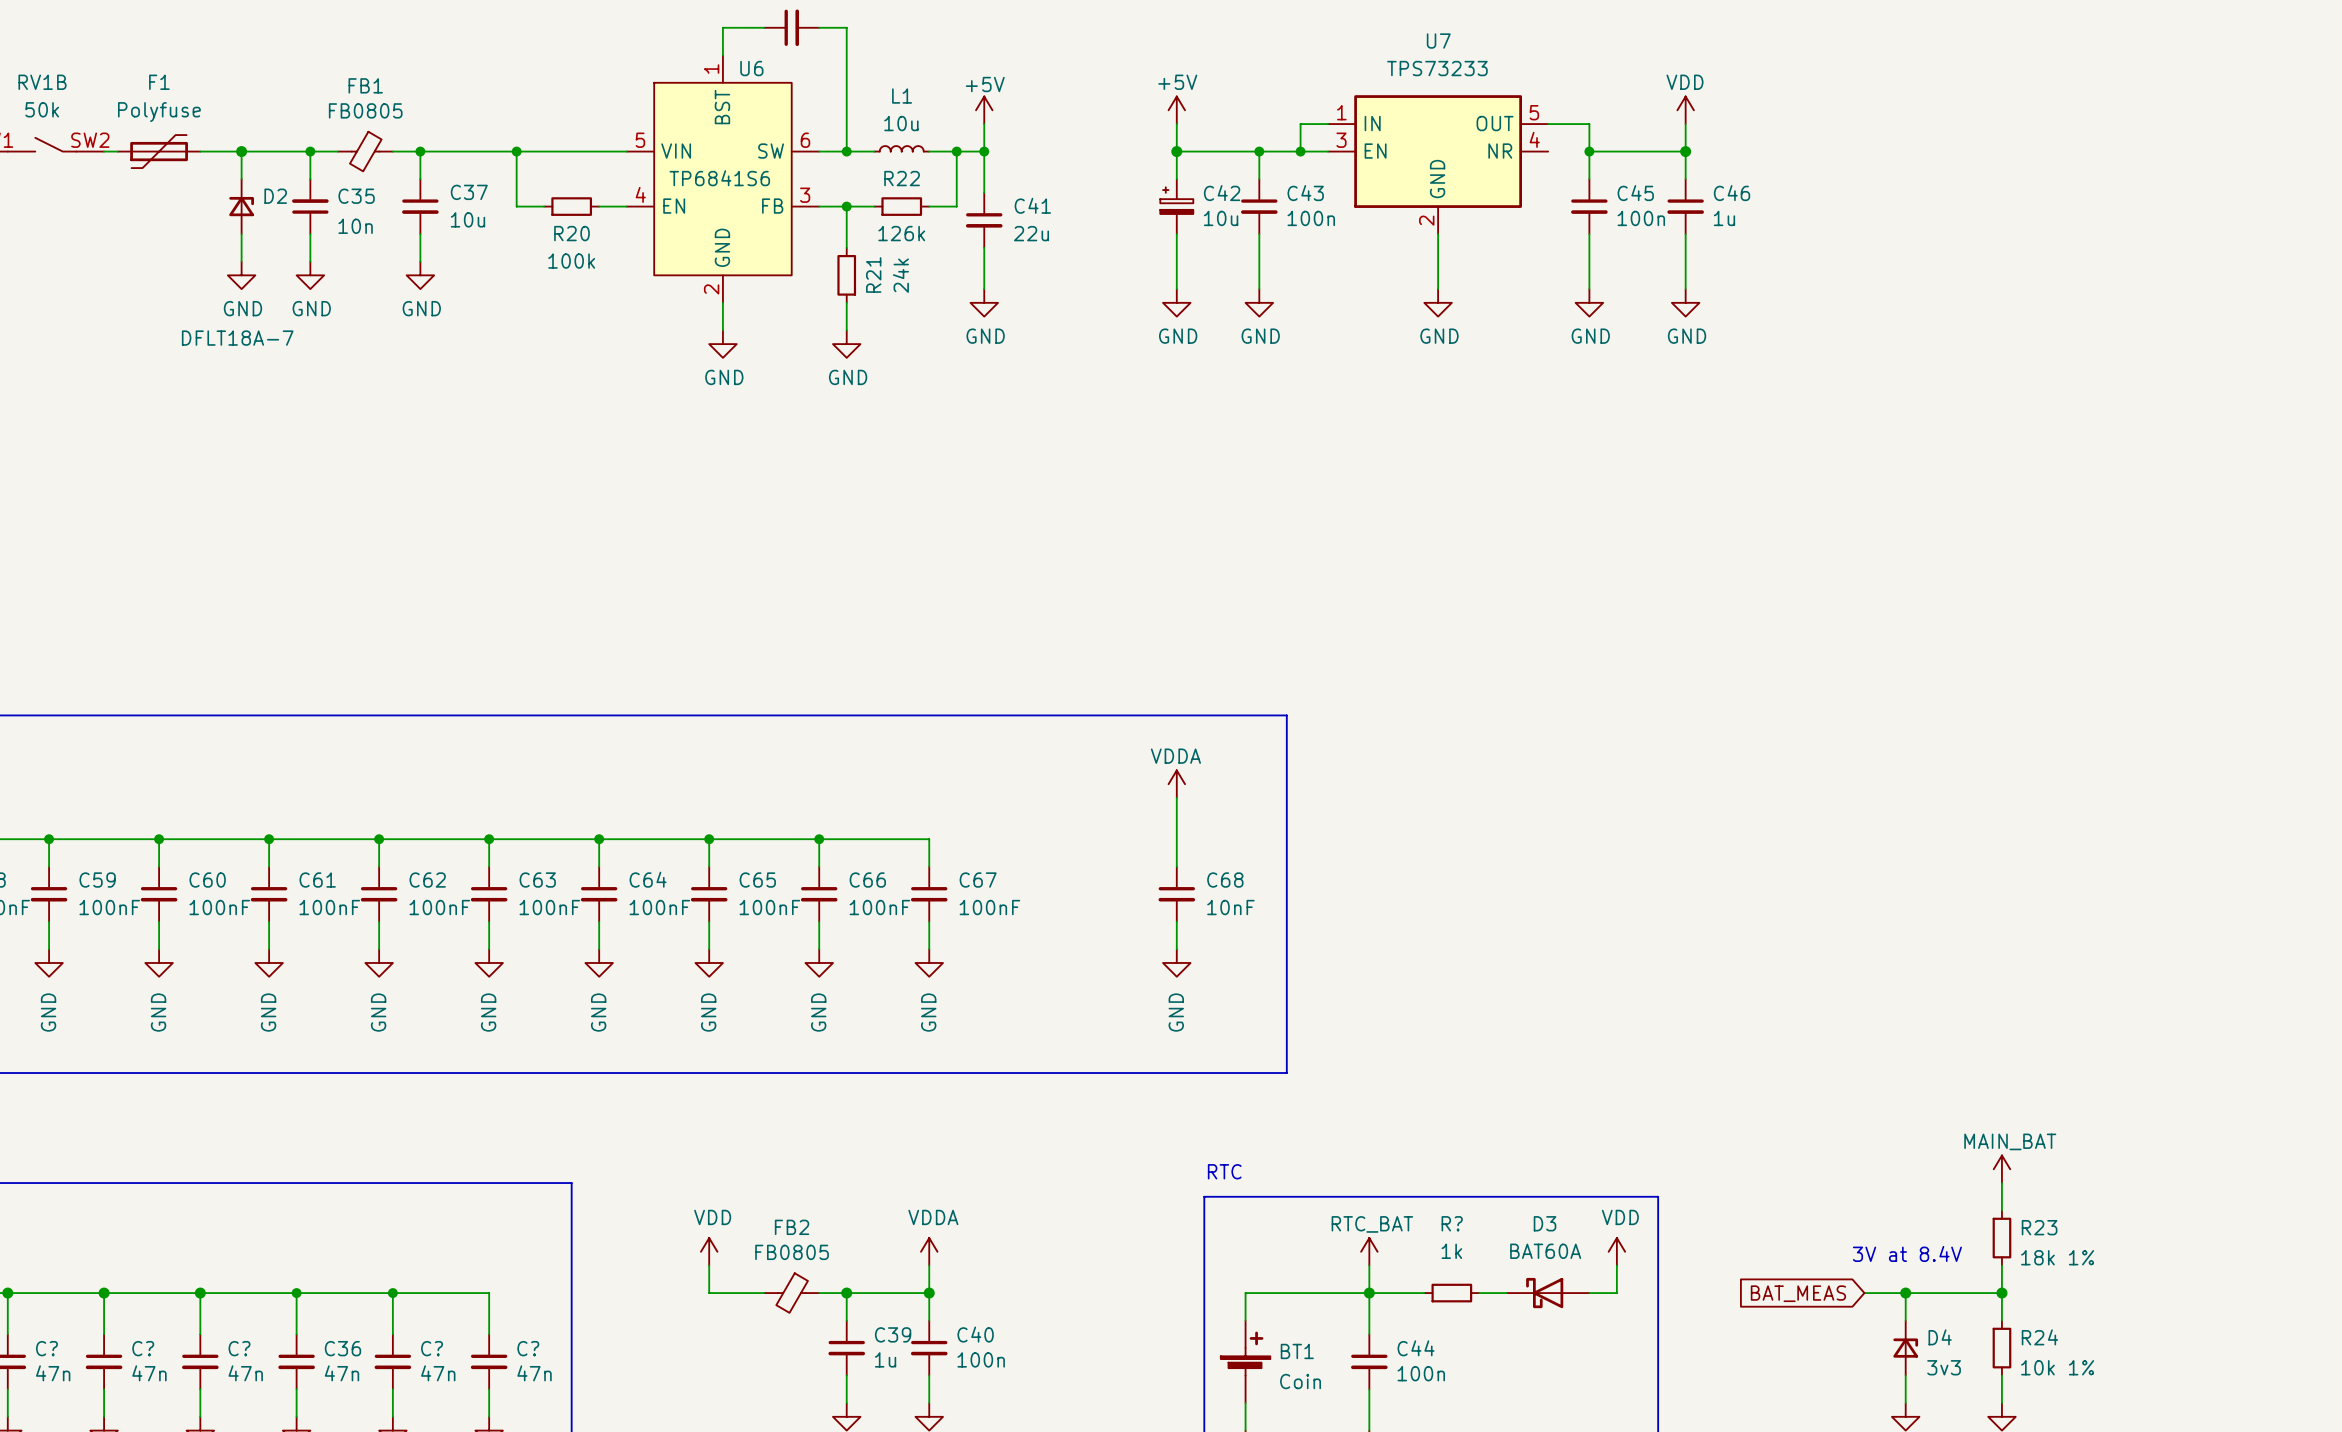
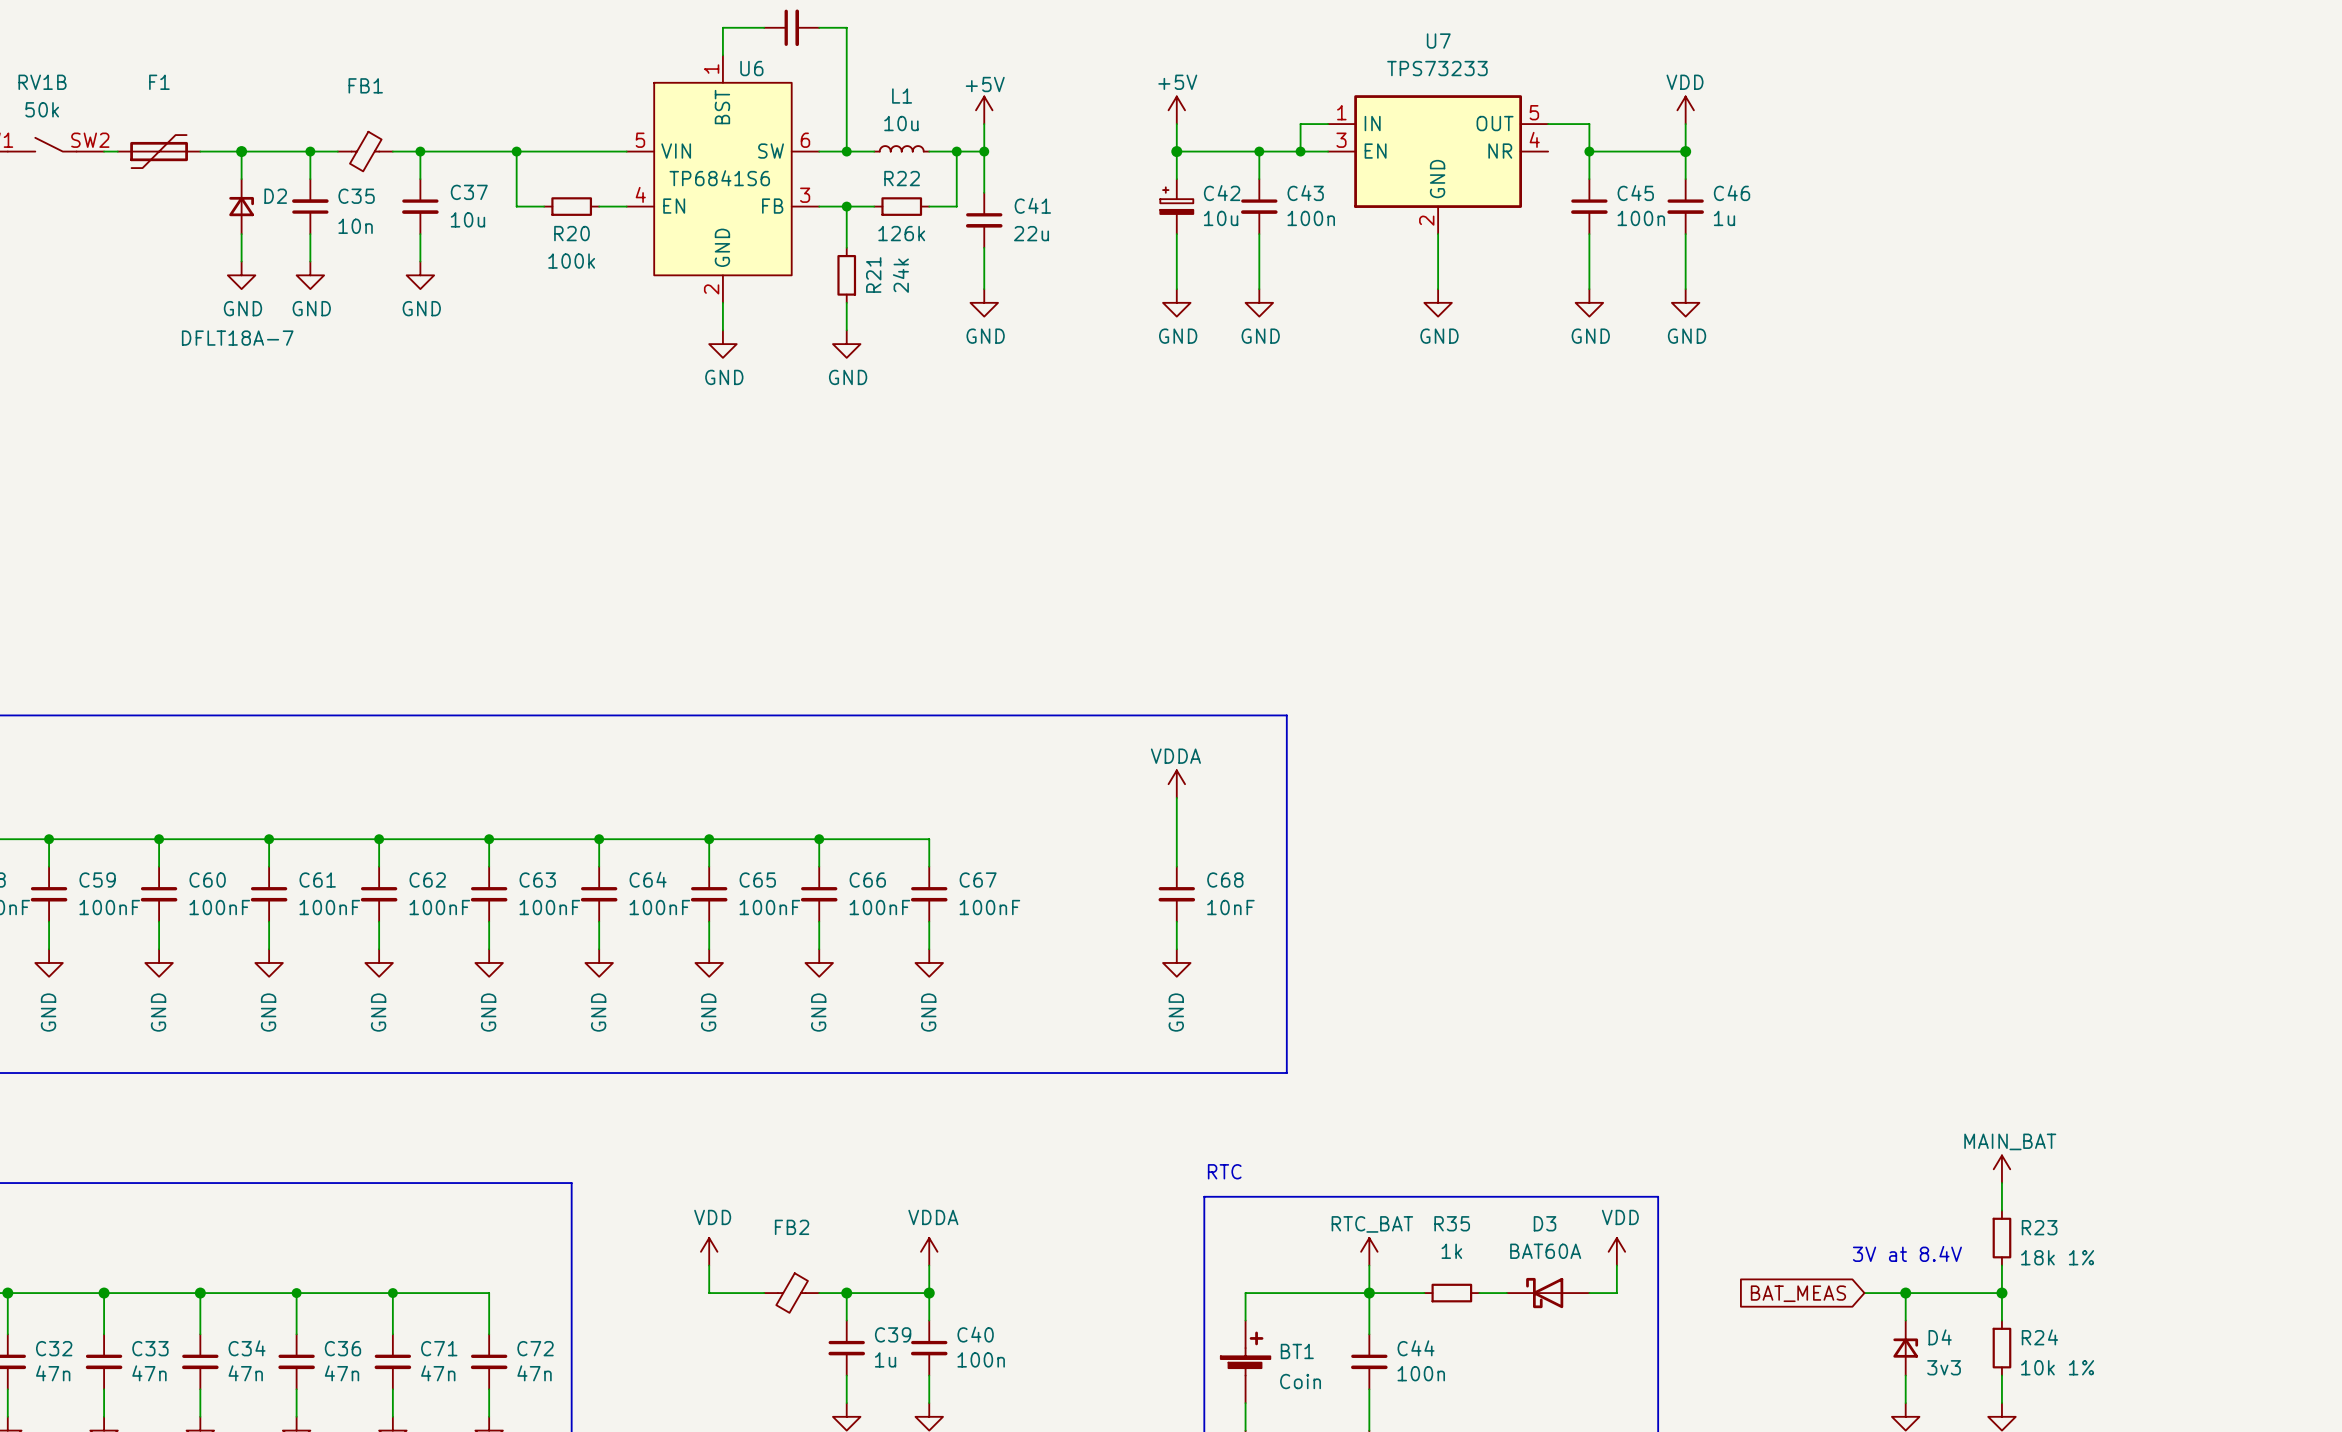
FB1 value: FB0805 (365, 110) -> none
F1 value: Polyfuse (159, 112) -> none
R? name: R? (1452, 1223) -> R35 (1452, 1223)
FB2 value: FB0805 (792, 1252) -> none
C? name: C? (46, 1348) -> C32 (54, 1348)
C? name: C? (143, 1348) -> C33 (150, 1348)
C? name: C? (239, 1348) -> C34 (247, 1348)
C? name: C? (432, 1348) -> C71 (439, 1348)
C? name: C? (528, 1348) -> C72 (535, 1348)

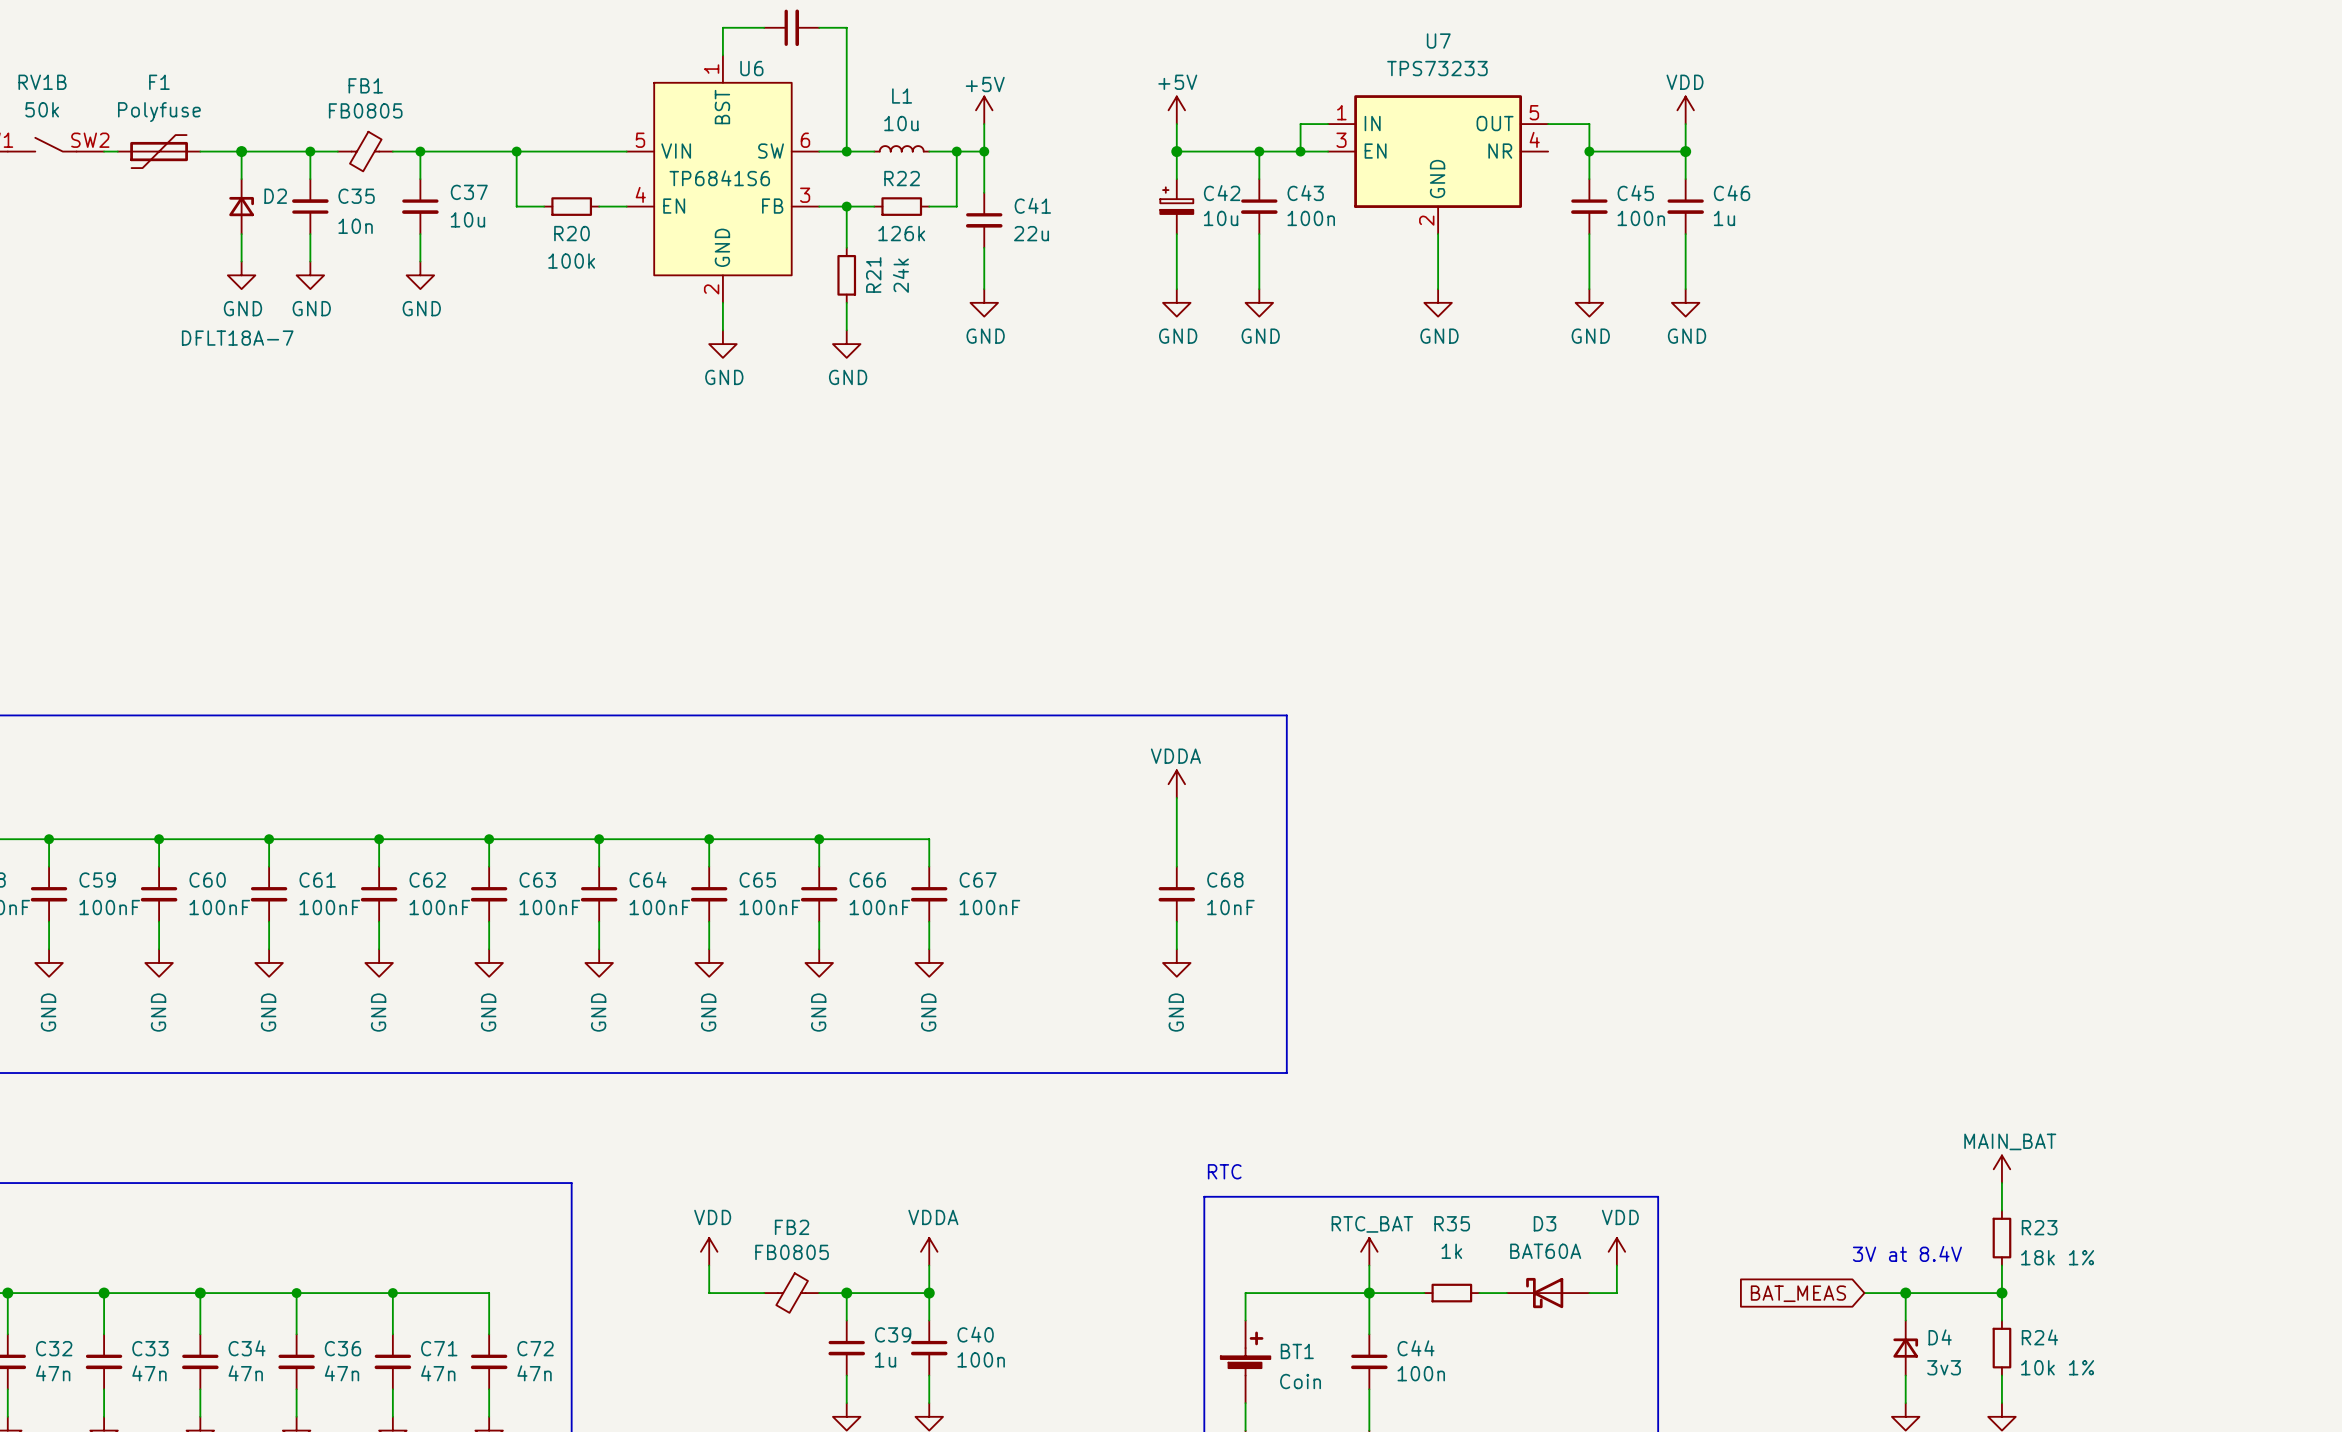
FB1 value: none -> FB0805 (365, 110)
F1 value: none -> Polyfuse (159, 112)
FB2 value: none -> FB0805 (792, 1252)

